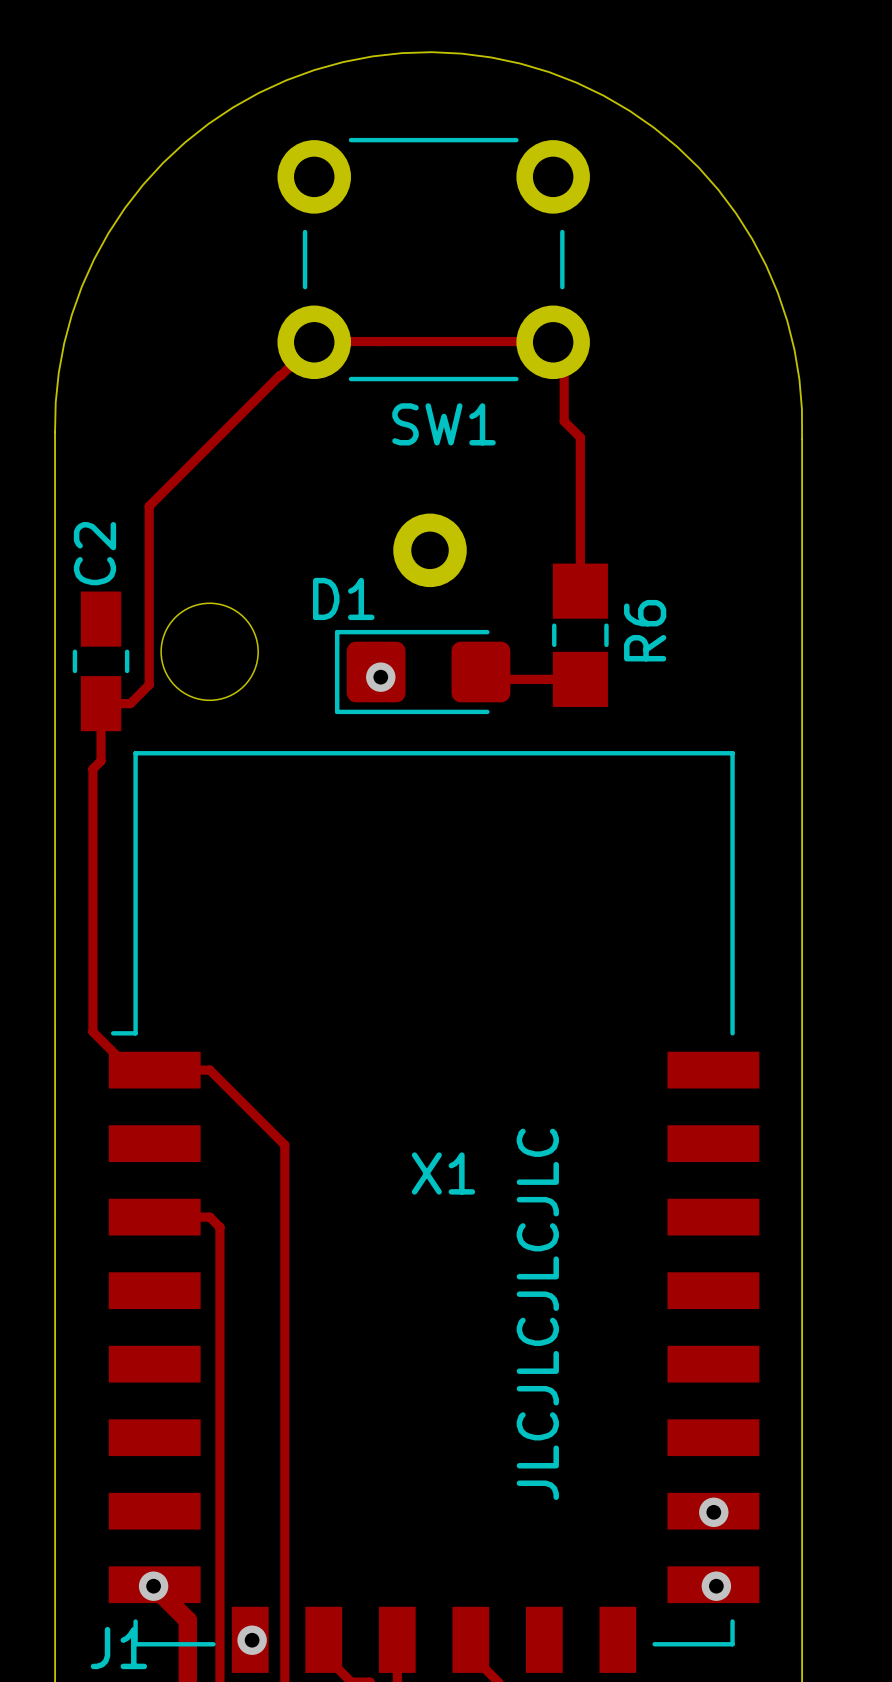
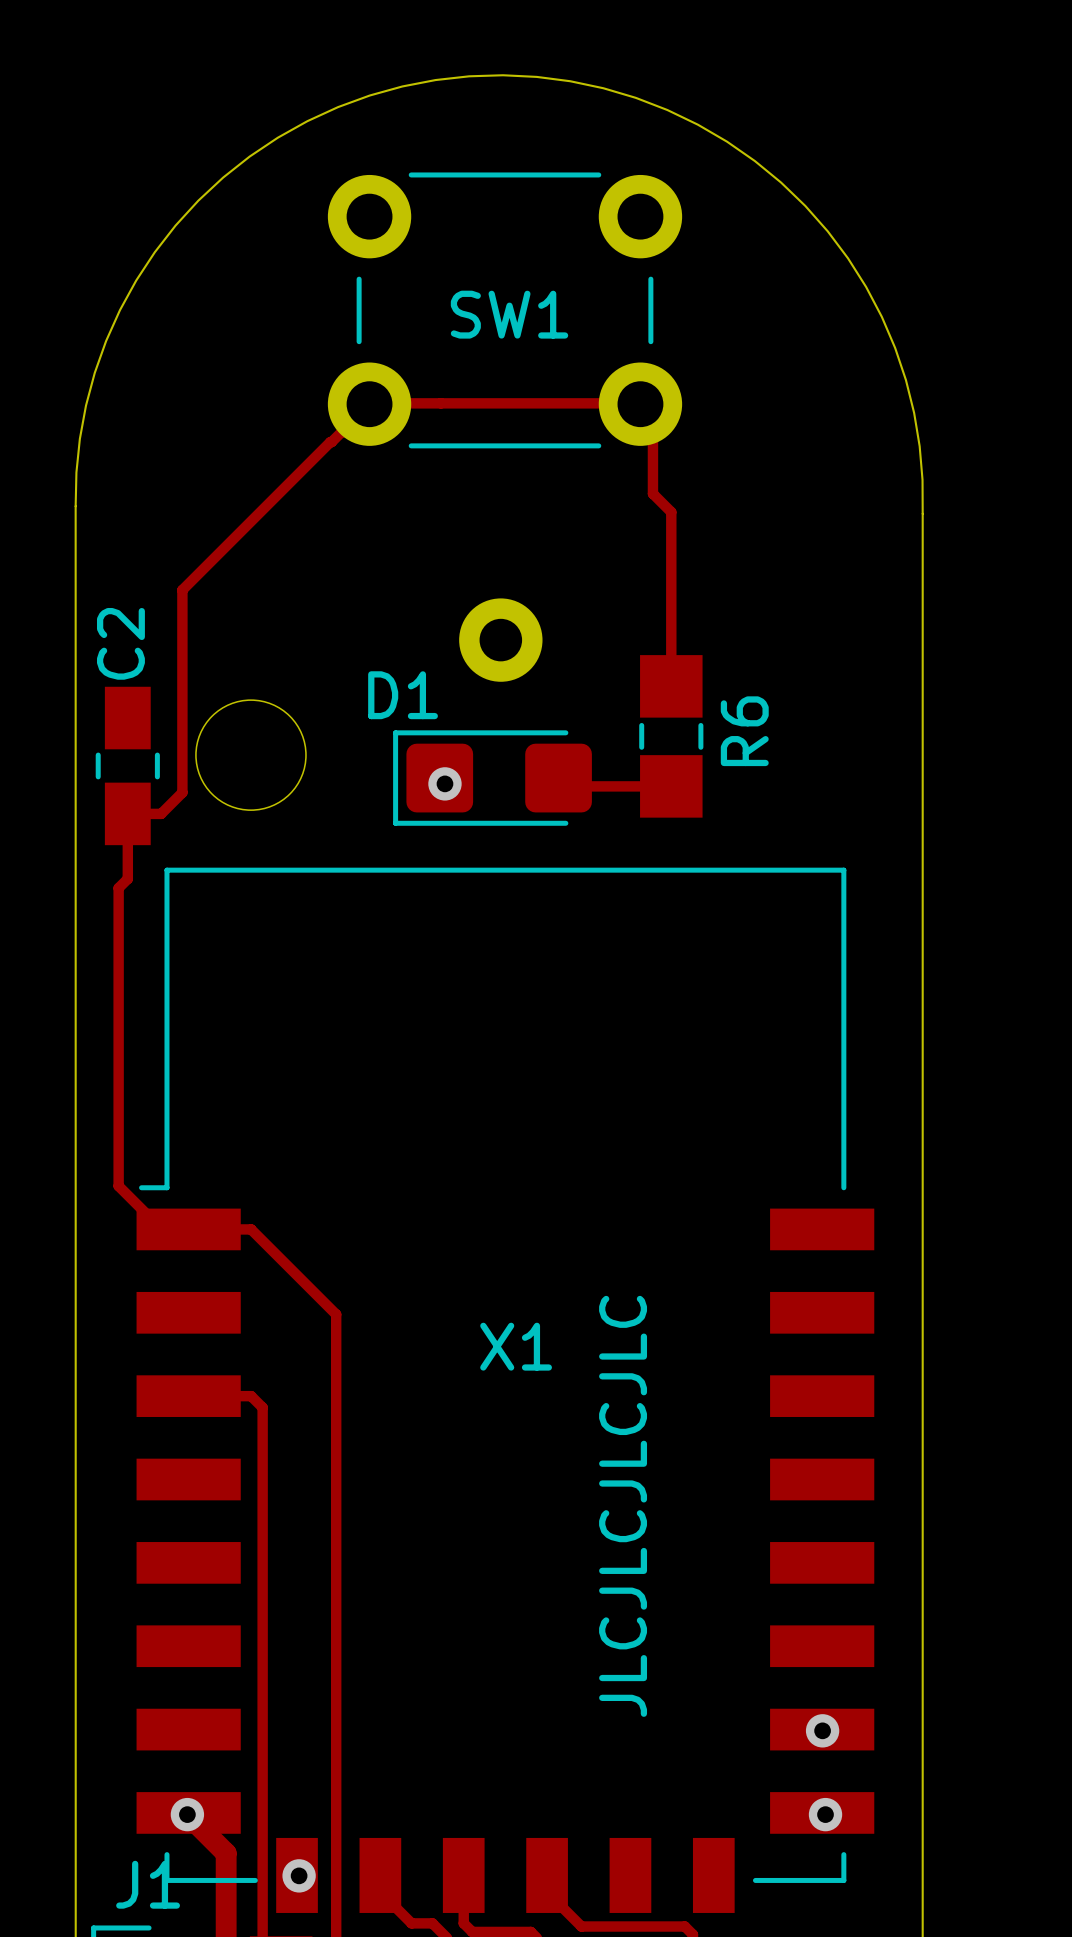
SW1 name position: SW1 (443, 424) -> SW1 (509, 314)

